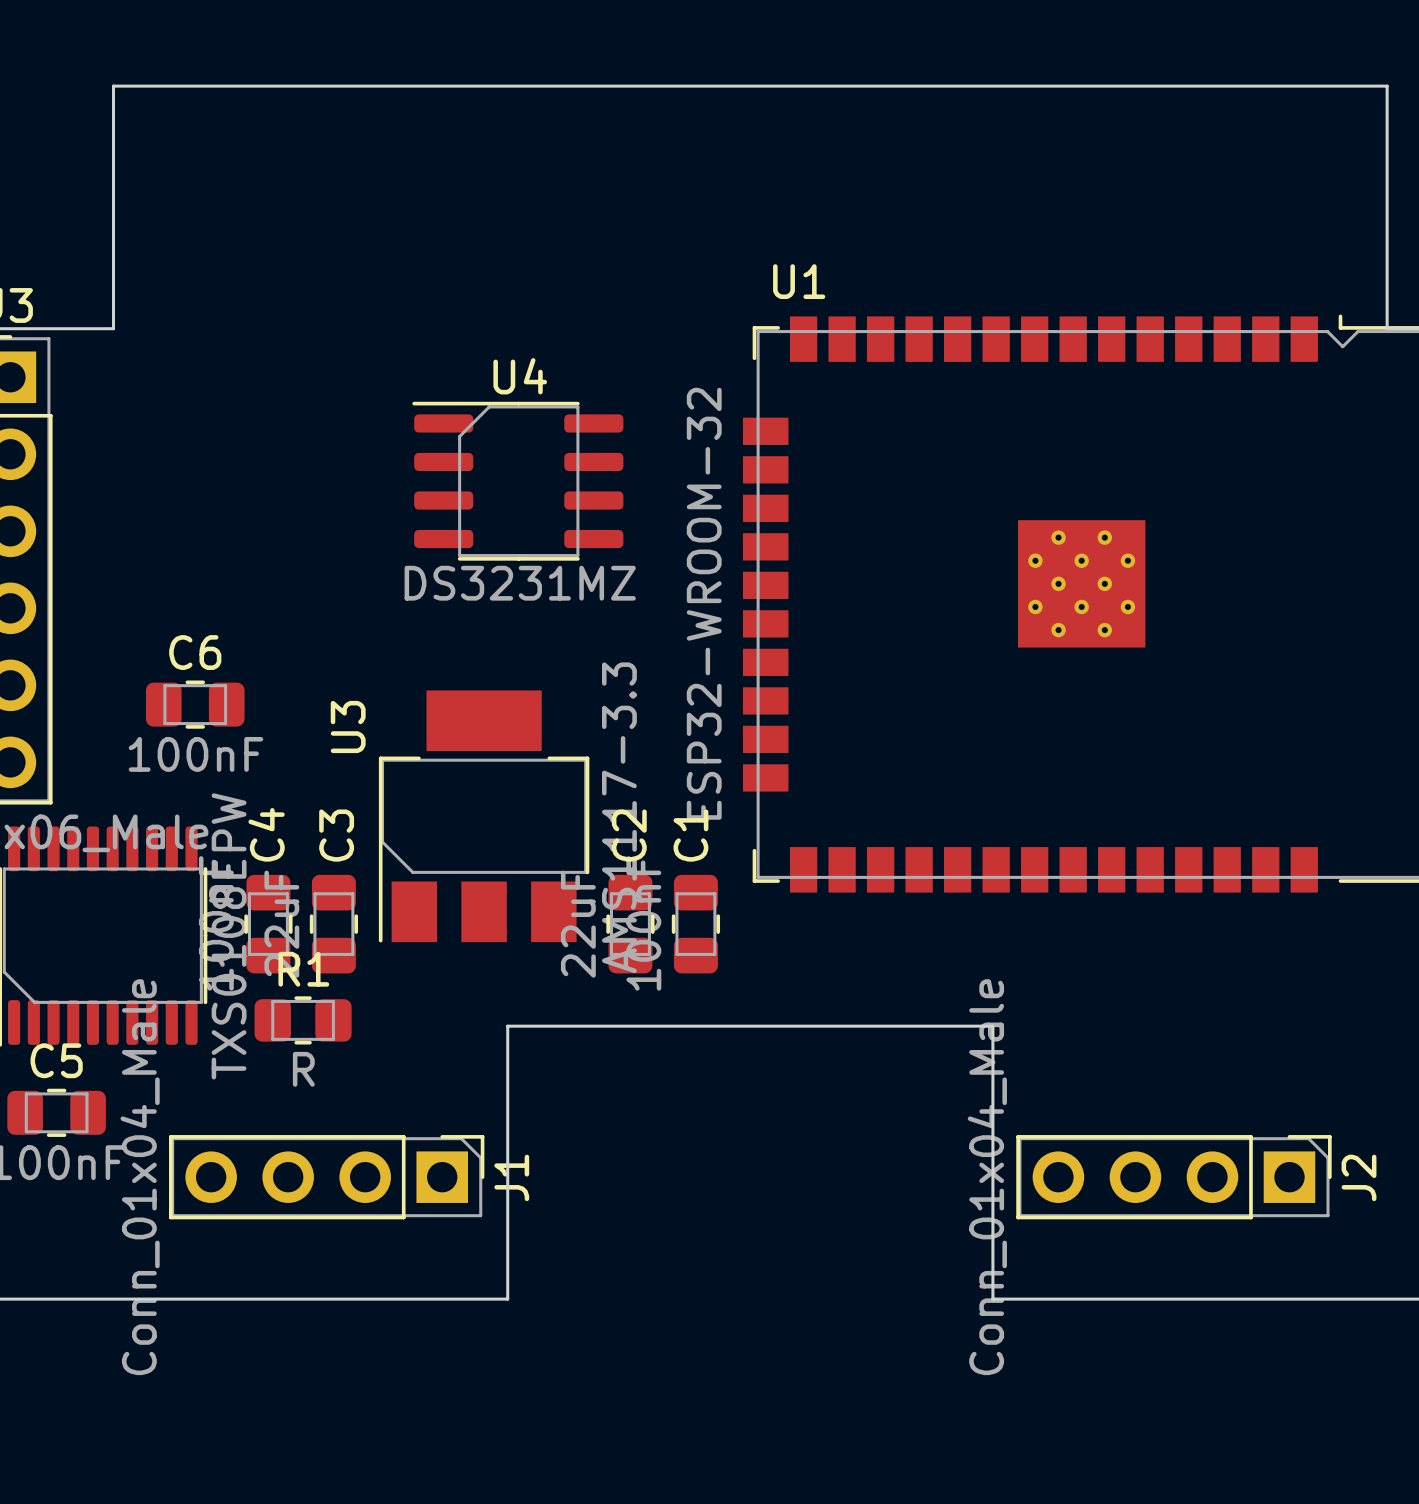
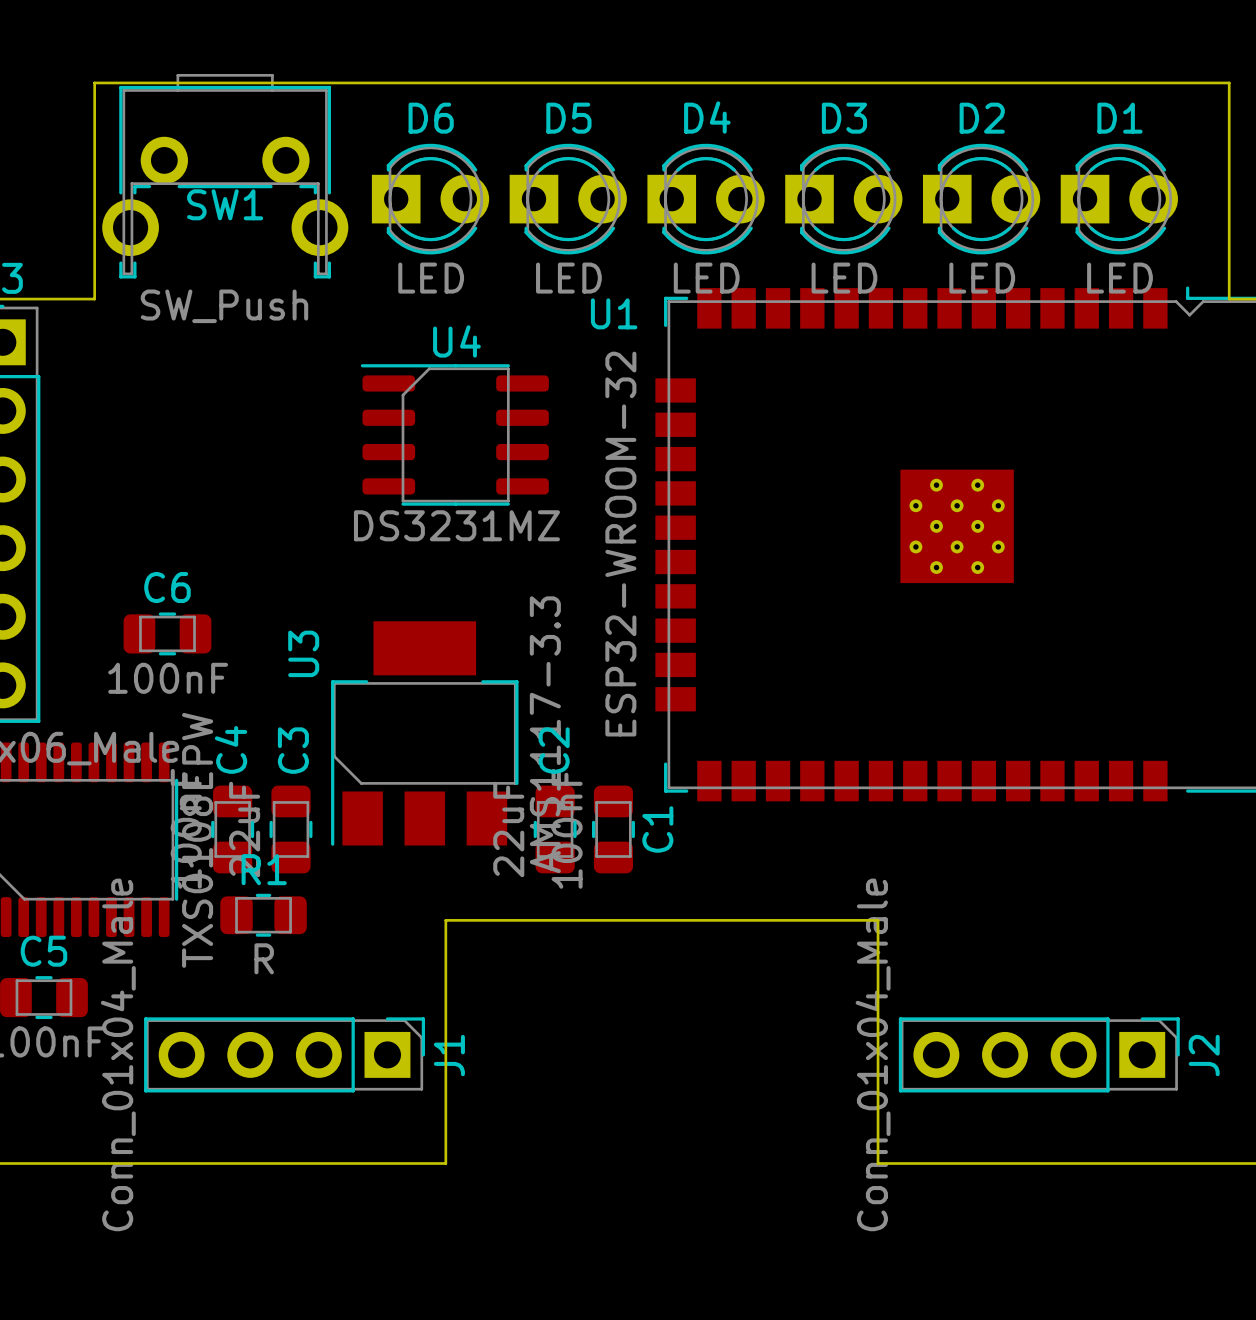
SW1: none -> SW_Push (225, 176)
D6: none -> LED (430, 199)
D5: none -> LED (568, 199)
D4: none -> LED (706, 199)
D3: none -> LED (843, 199)
D2: none -> LED (981, 199)
D1: none -> LED (1119, 199)
U1 name position: U1 (799, 281) -> U1 (614, 313)
C1 name position: C1 (690, 835) -> C1 (657, 829)

